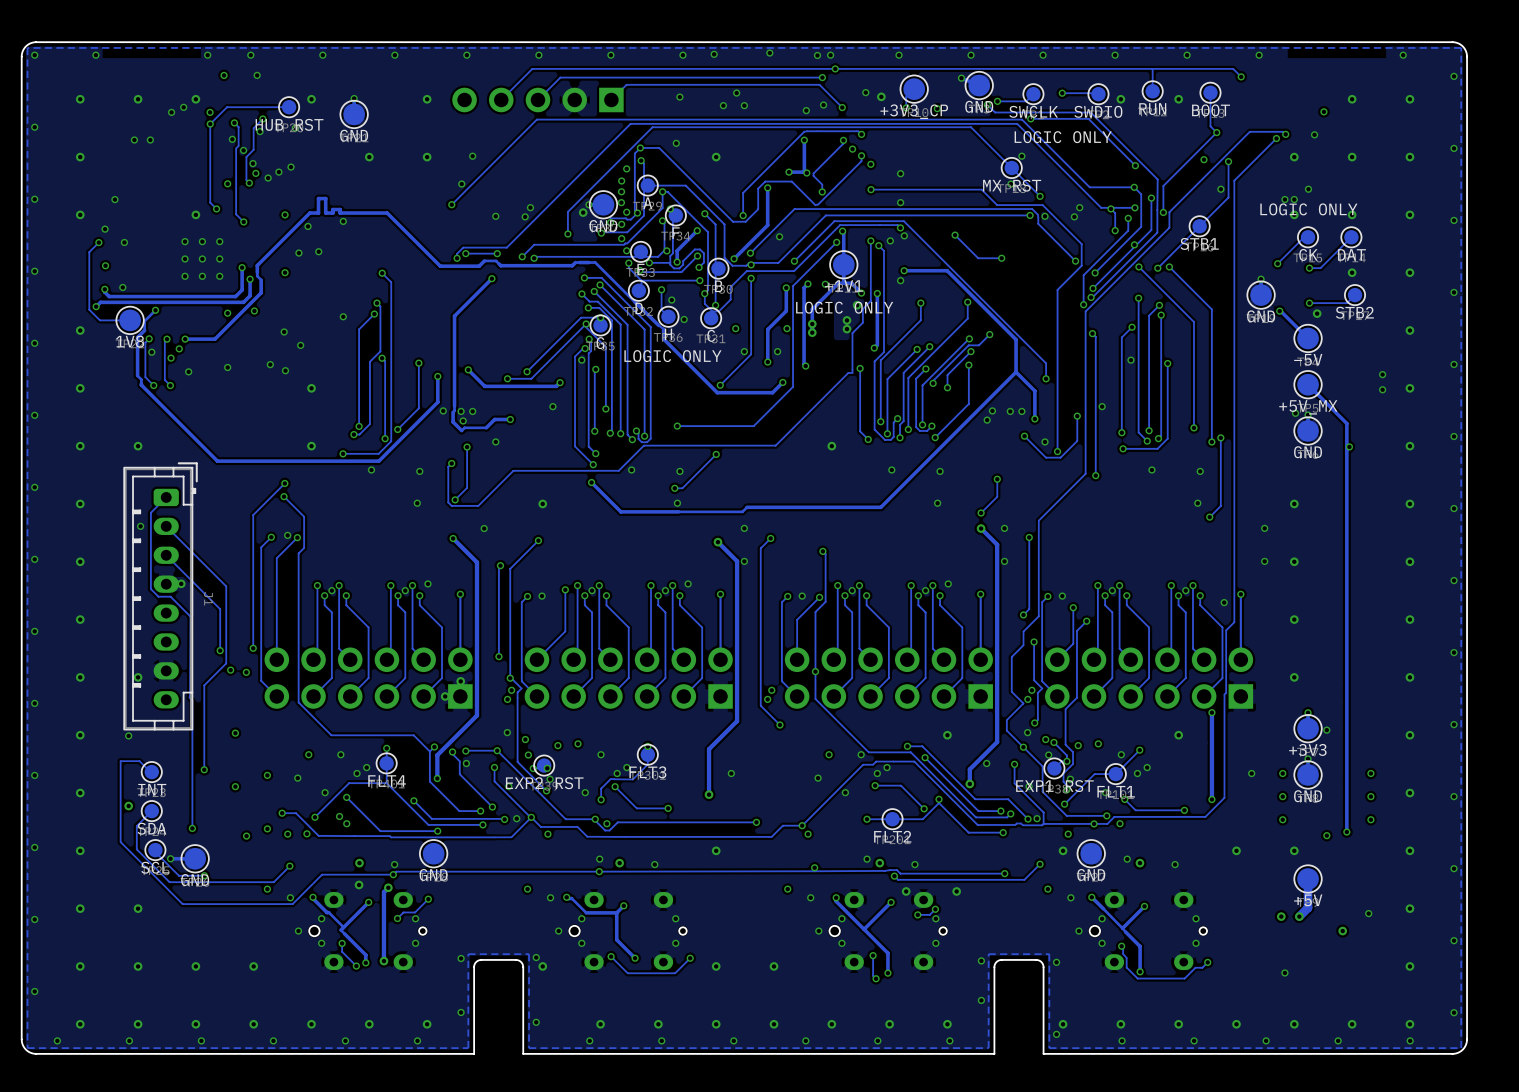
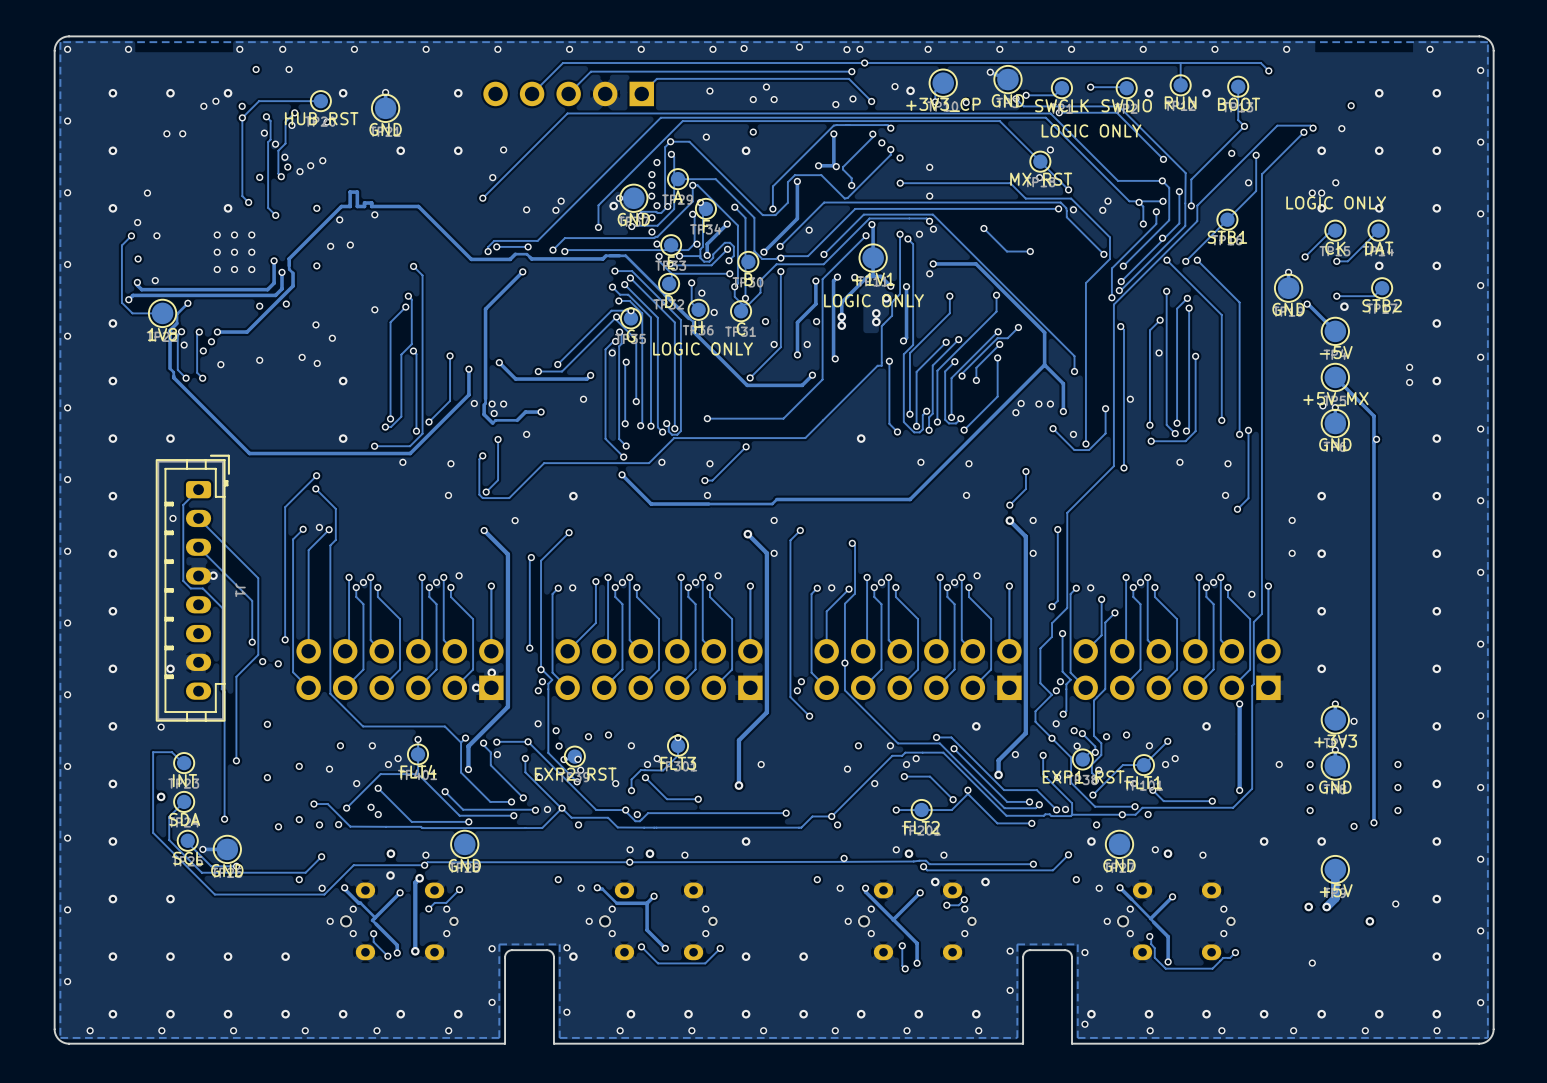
via: none -> (753, 132)

